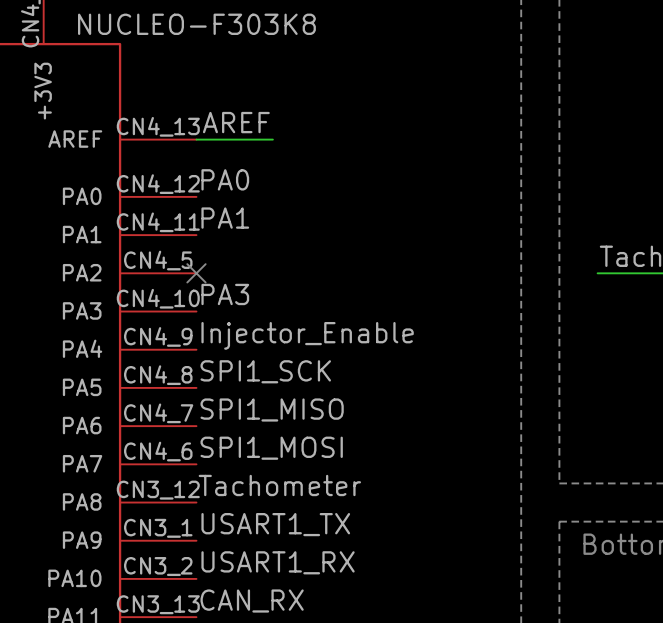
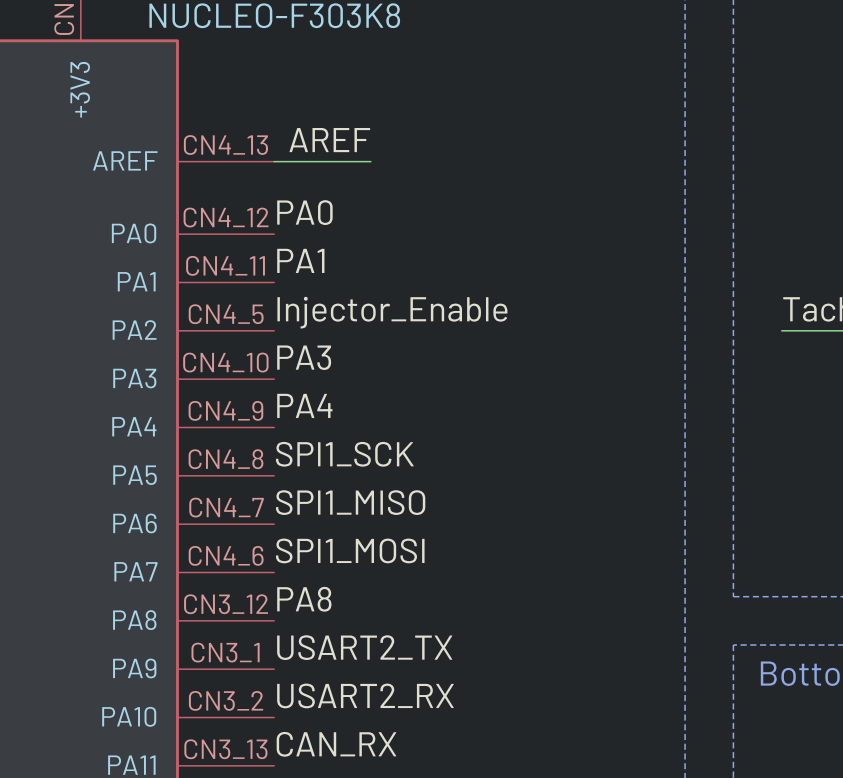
label: none -> Injector_Enable (392, 312)
no-connect mark: (196, 273) -> none
label: Injector_Enable (307, 335) -> PA4 (304, 405)
label: Tachometer (279, 485) -> PA8 (304, 599)
label: USART1_TX (275, 524) -> USART2_TX (364, 647)
label: USART1_RX (278, 562) -> USART2_RX (365, 695)

